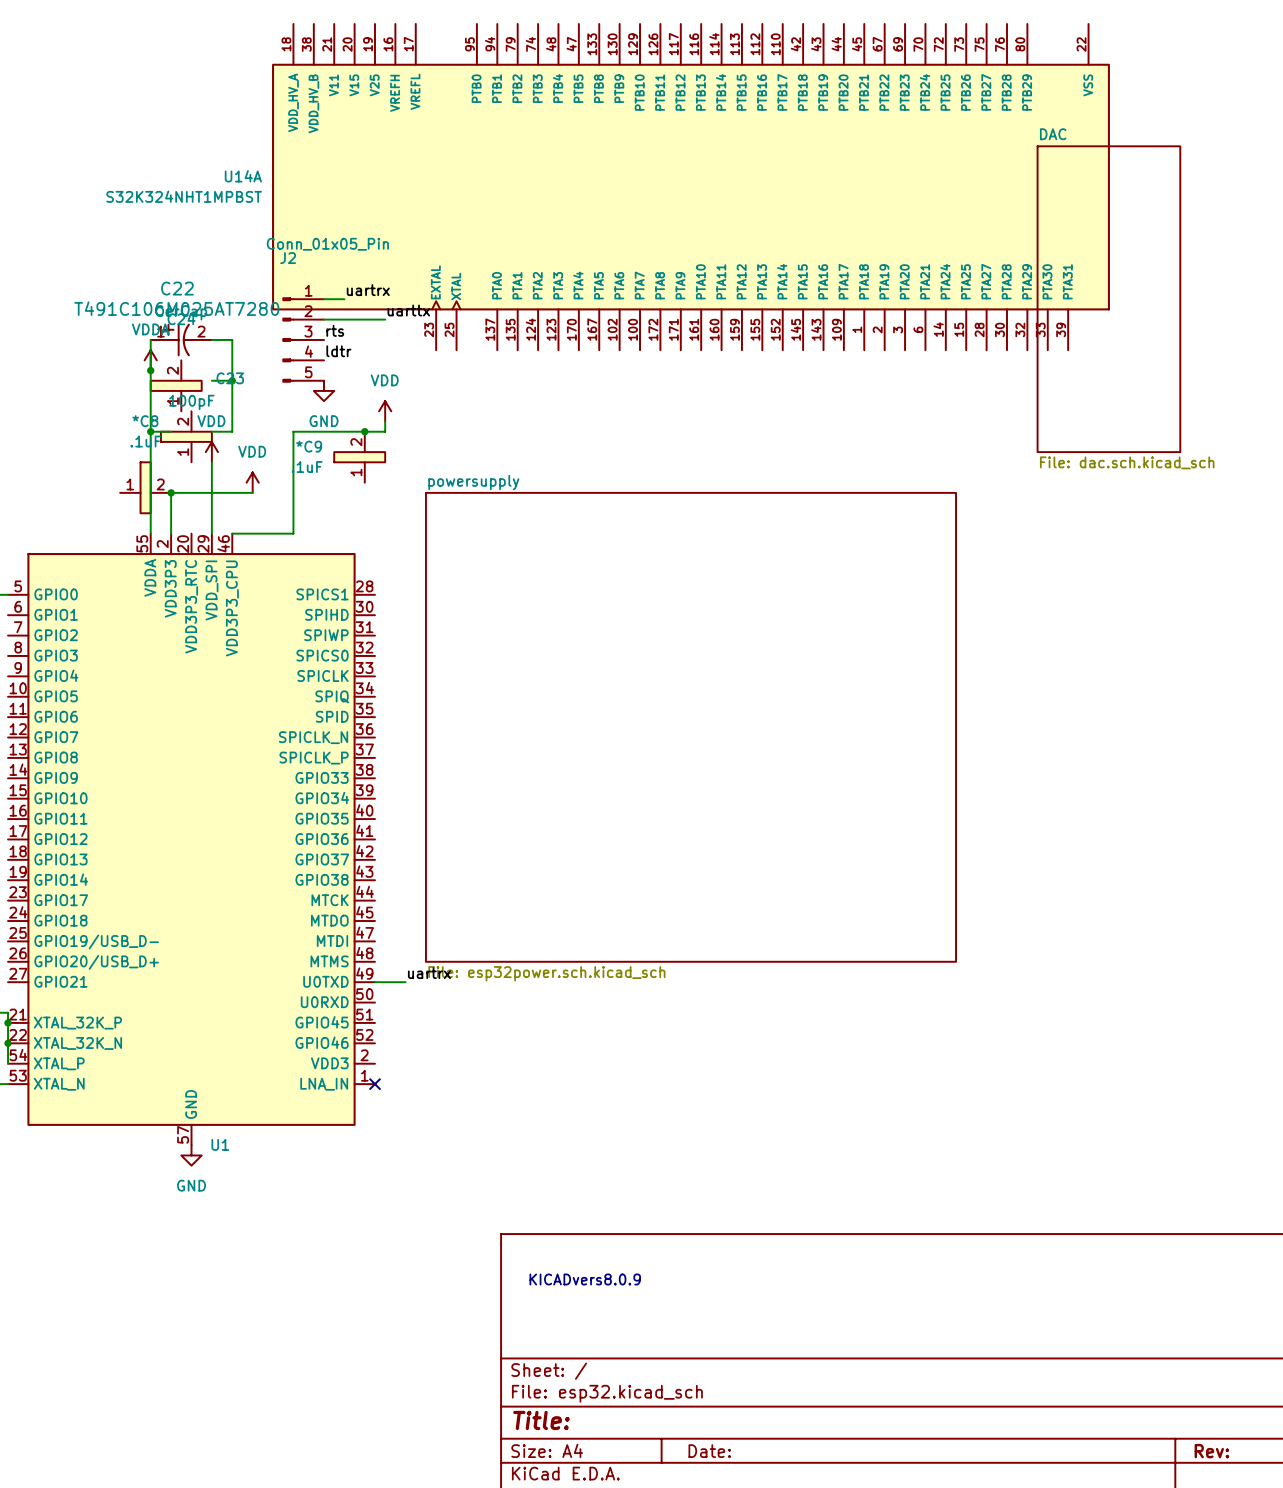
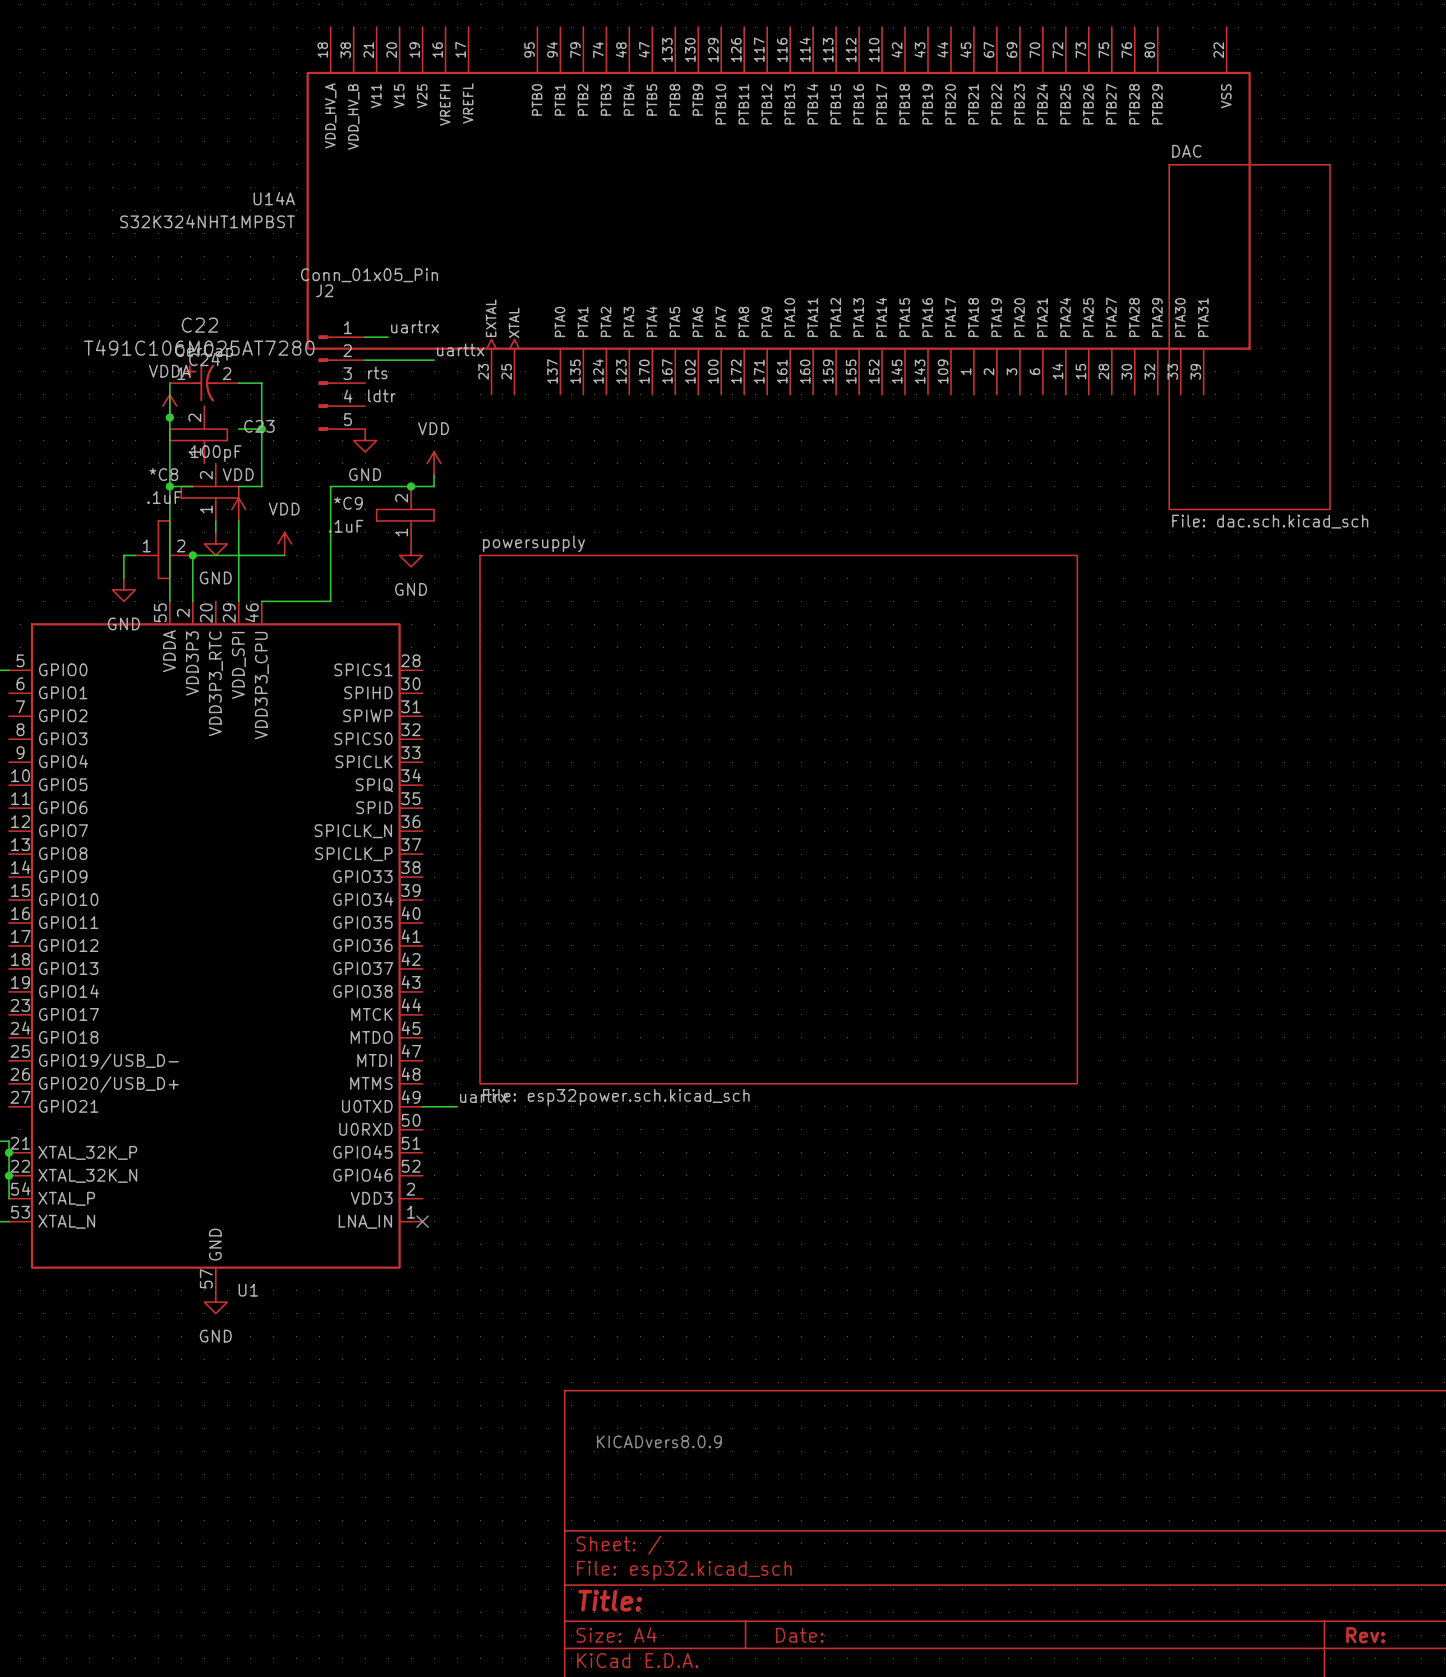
wire: none -> (215, 520) (215, 532)
power symbol: none -> GND (215, 543)
wire: none -> (135, 555) (123, 555) (123, 578)
power symbol: none -> GND (411, 555)
power symbol: none -> GND (123, 589)

